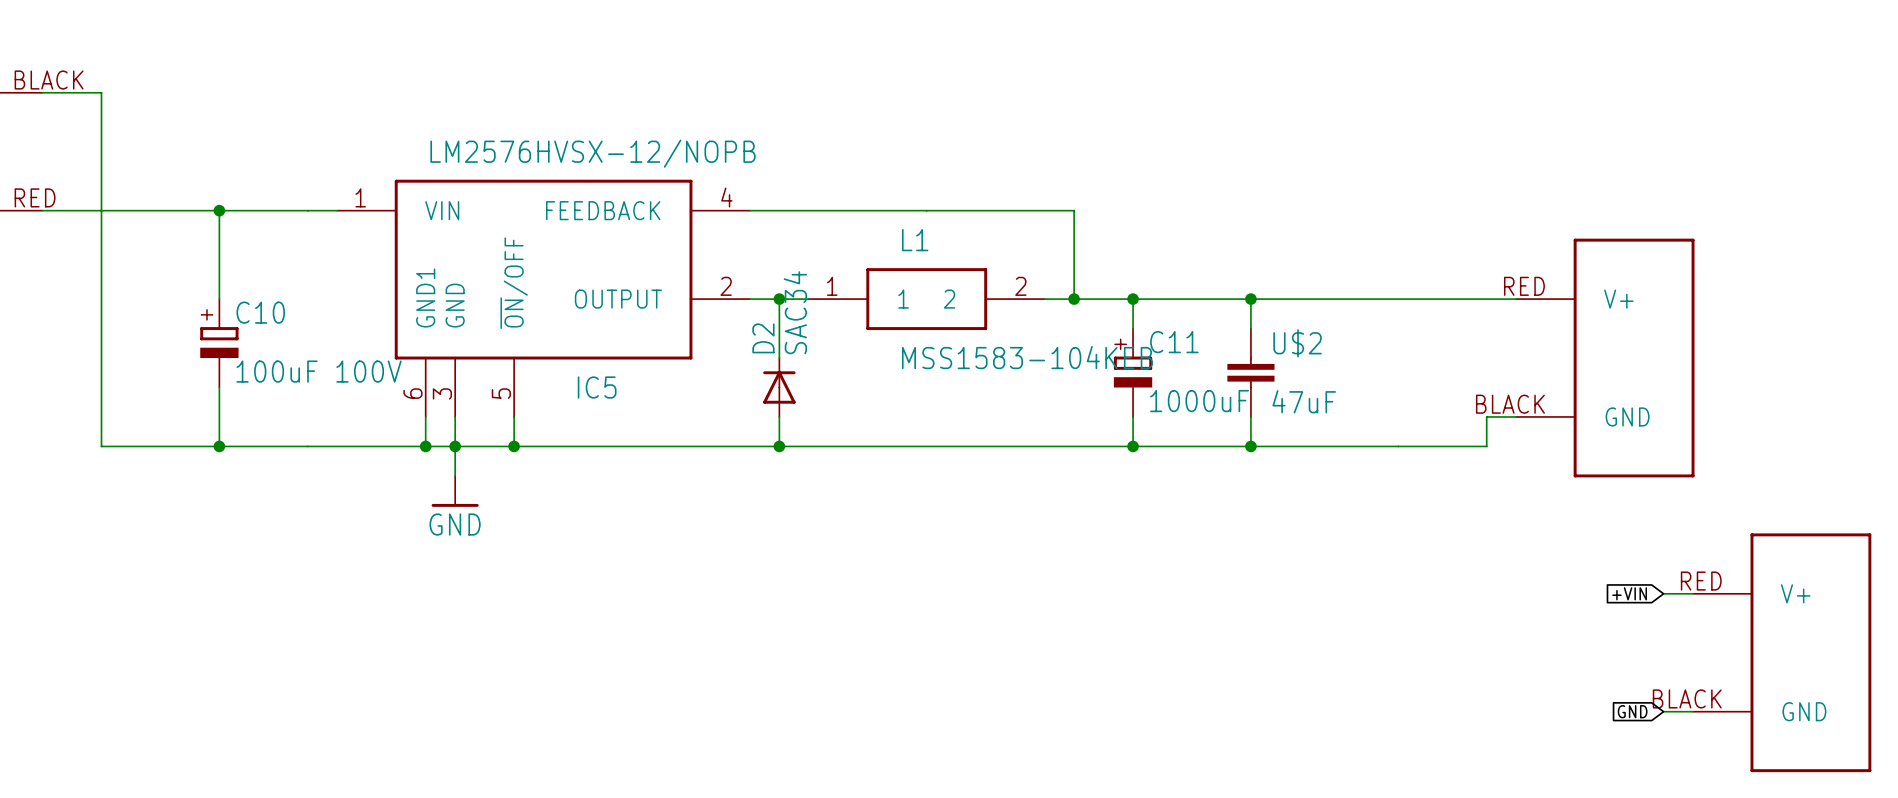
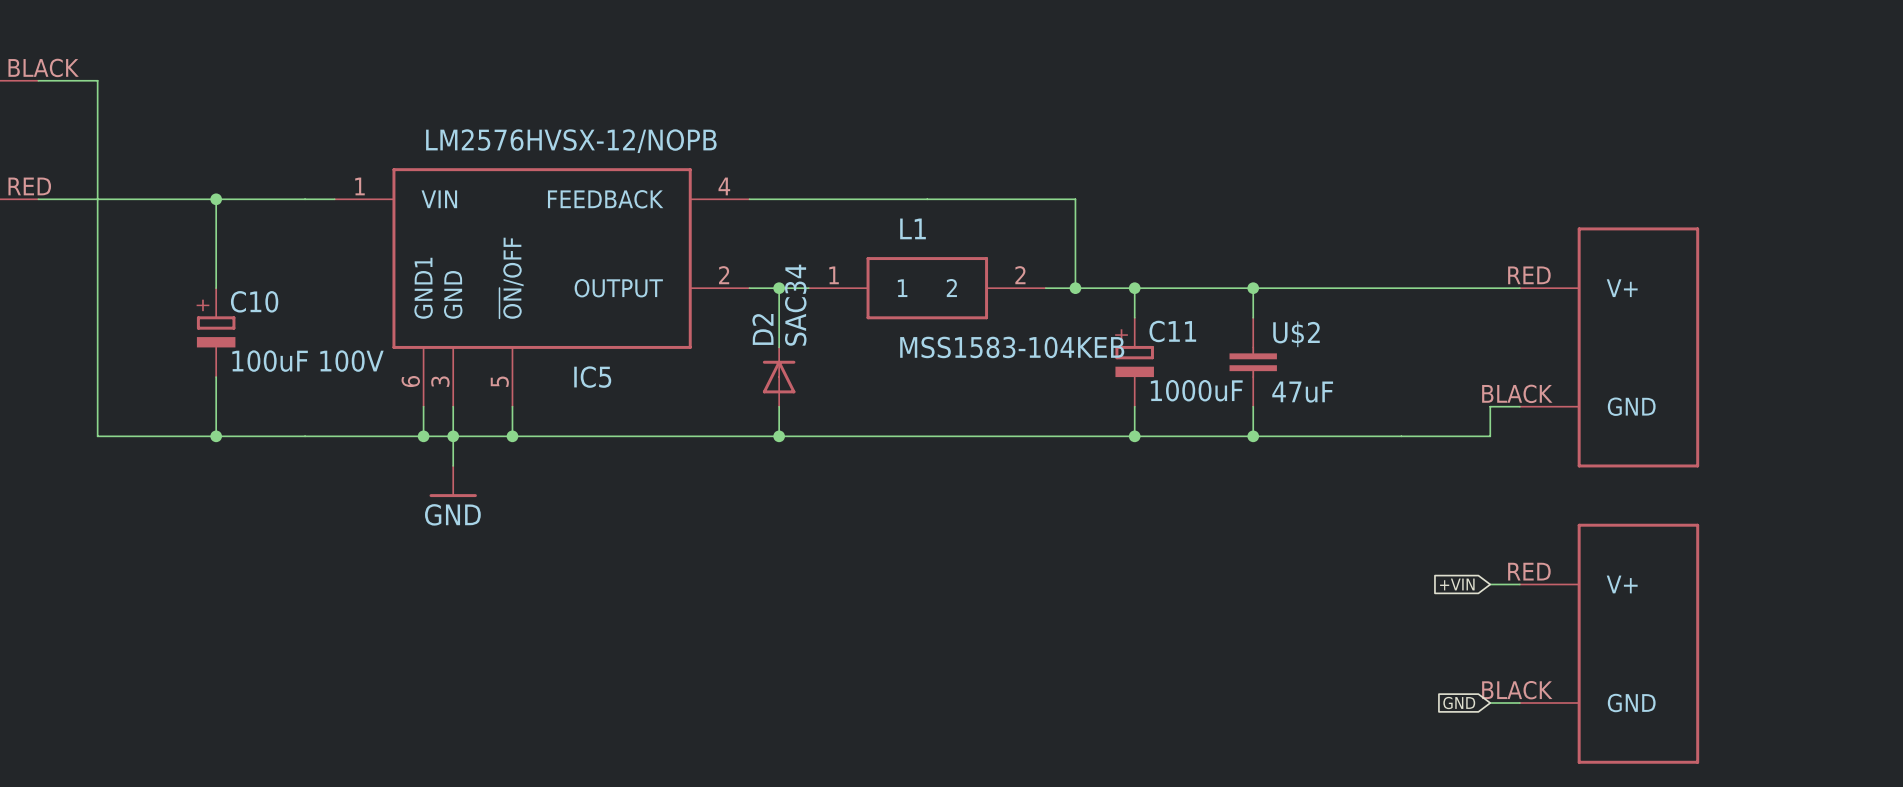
global label position: +VIN (1629, 593) -> +VIN (1457, 584)
wire: (1663, 593) (1693, 593) -> (1490, 584) (1519, 584)
part position: (1782, 652) -> (1609, 643)
global label position: GND (1632, 711) -> GND (1459, 703)
wire: (1663, 711) (1693, 711) -> (1490, 703) (1519, 703)

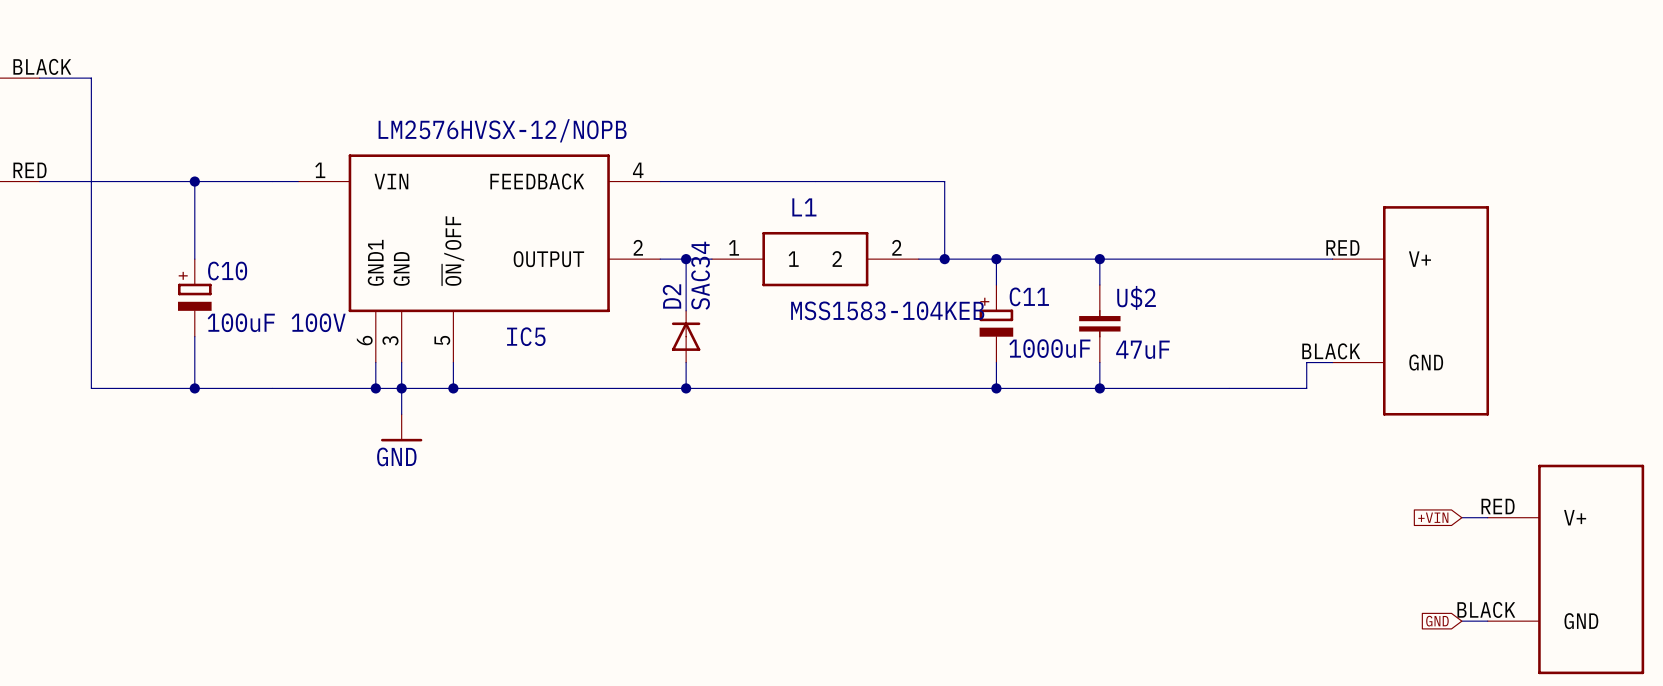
global label position: +VIN (1457, 584) -> +VIN (1433, 517)
wire: (1490, 584) (1519, 584) -> (1461, 517) (1487, 517)
part position: (1609, 643) -> (1565, 569)
global label position: GND (1459, 703) -> GND (1437, 621)
wire: (1490, 703) (1519, 703) -> (1461, 621) (1487, 621)

